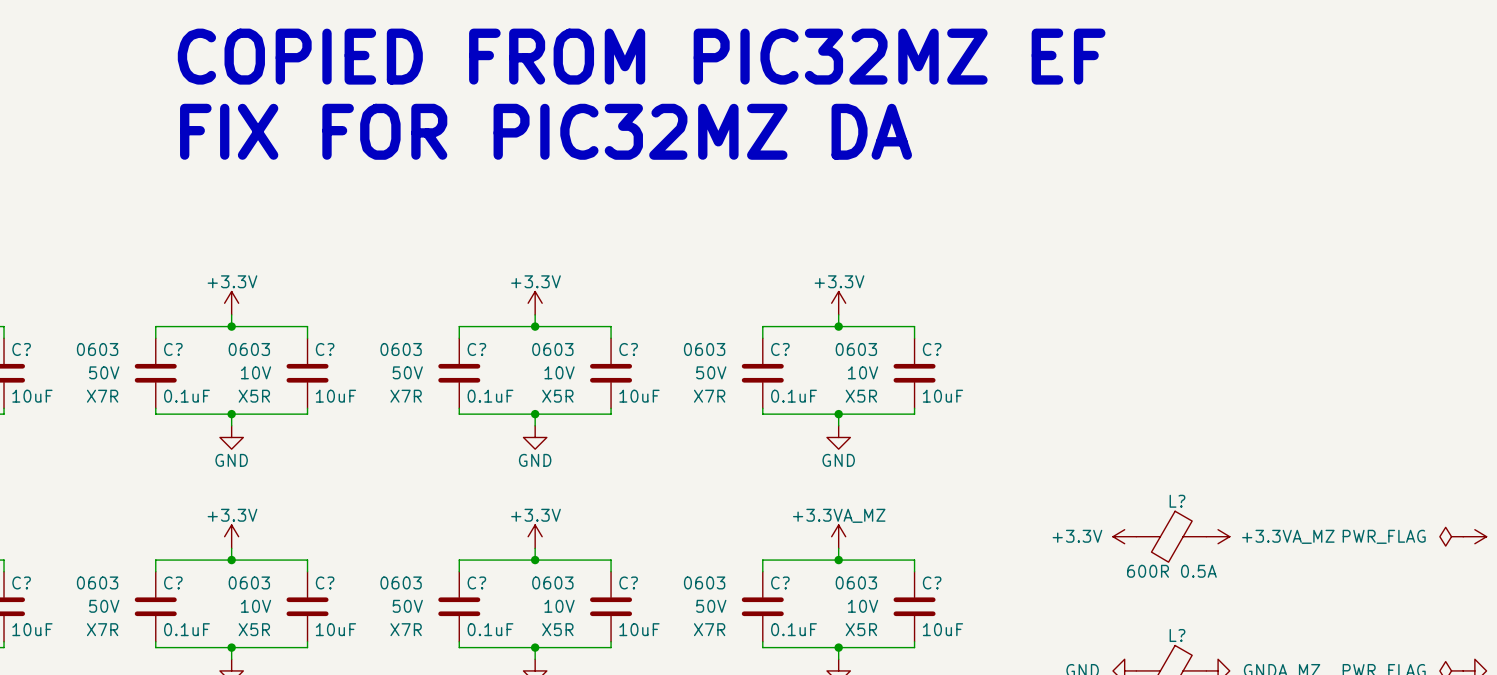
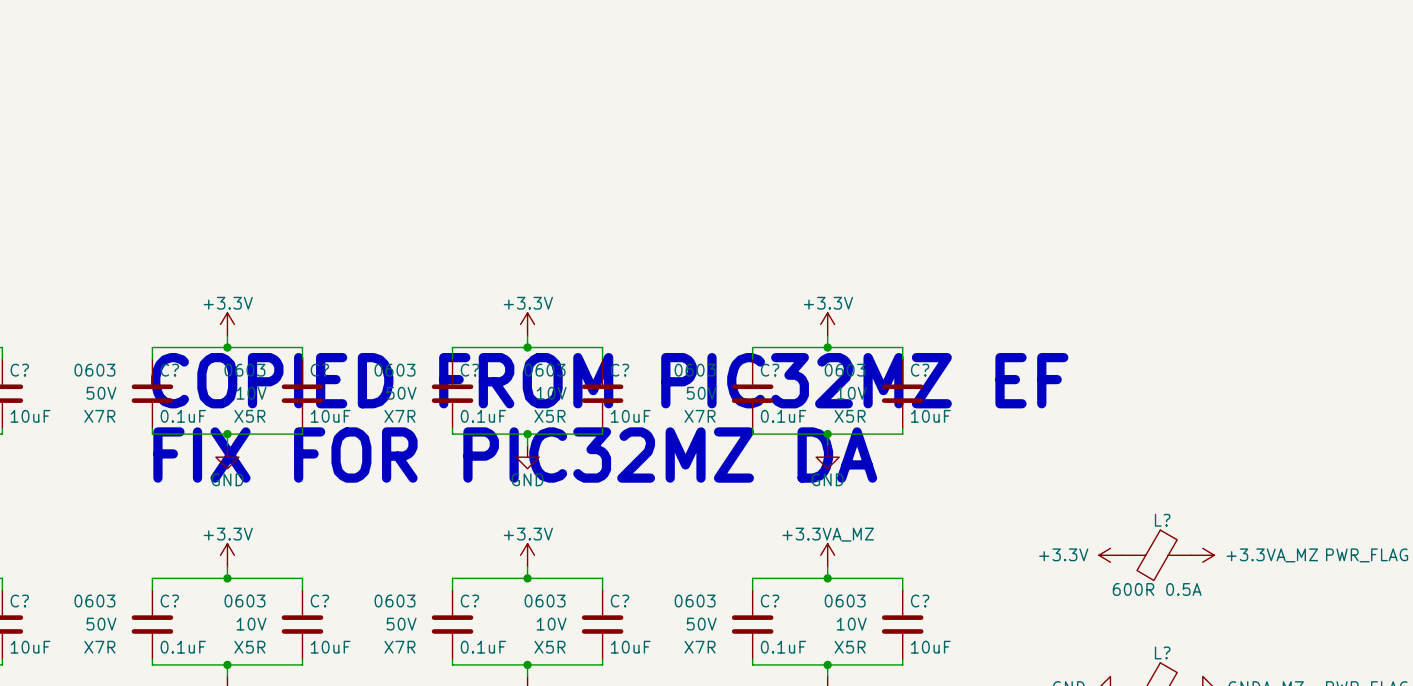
text: COPIED FROM PIC32MZ EF (641, 56) -> none
text: FIX FOR PIC32MZ DA (546, 131) -> none
text: none -> COPIED FROM PIC32MZ EF (609, 380)
text: none -> FIX FOR PIC32MZ DA (515, 455)

